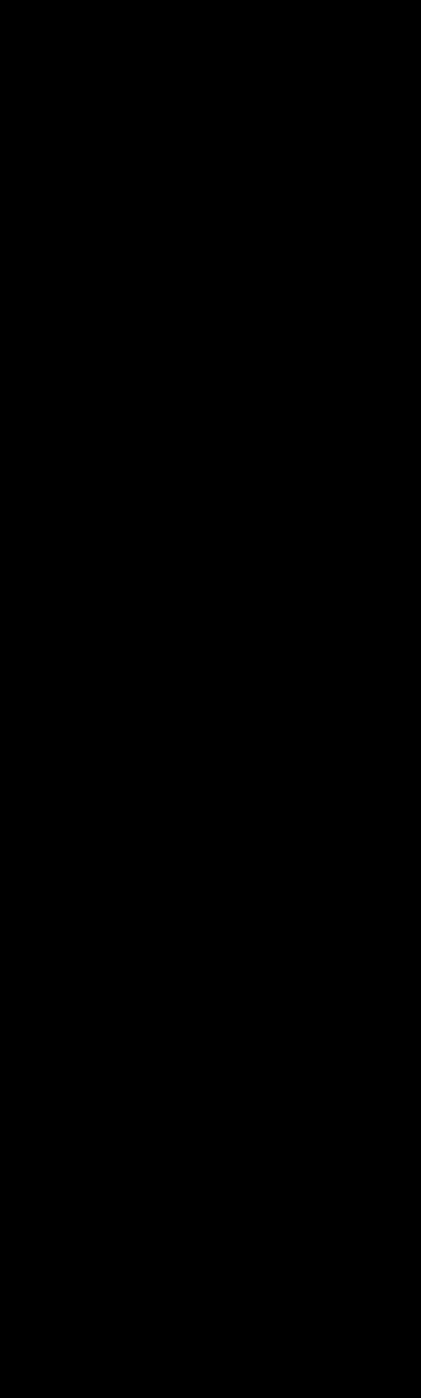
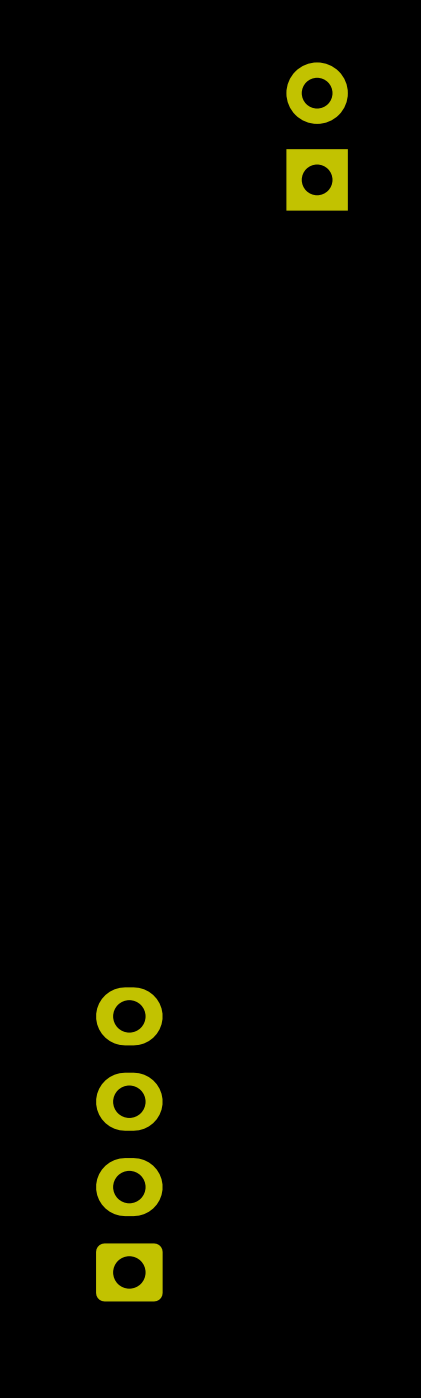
part: none -> (317, 136)
part: none -> (129, 1144)

